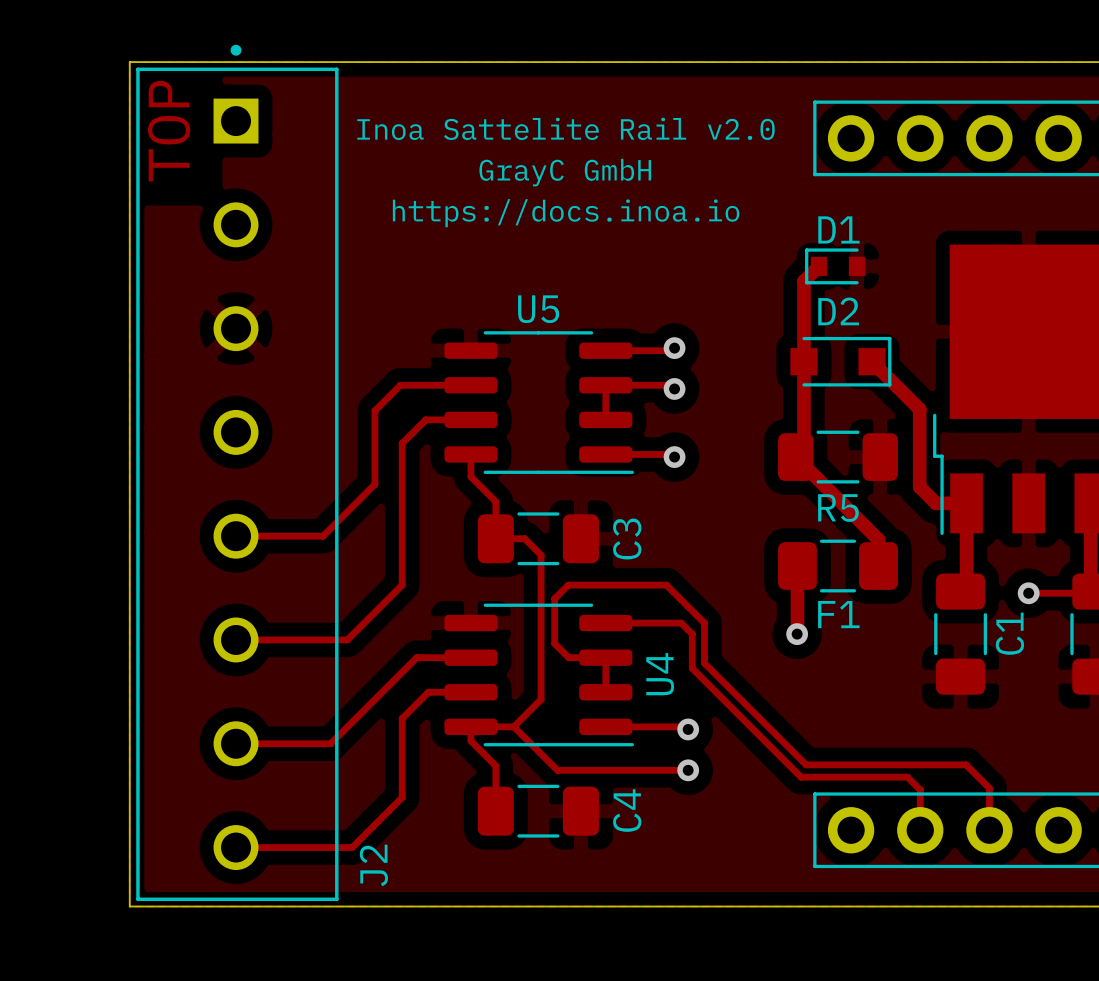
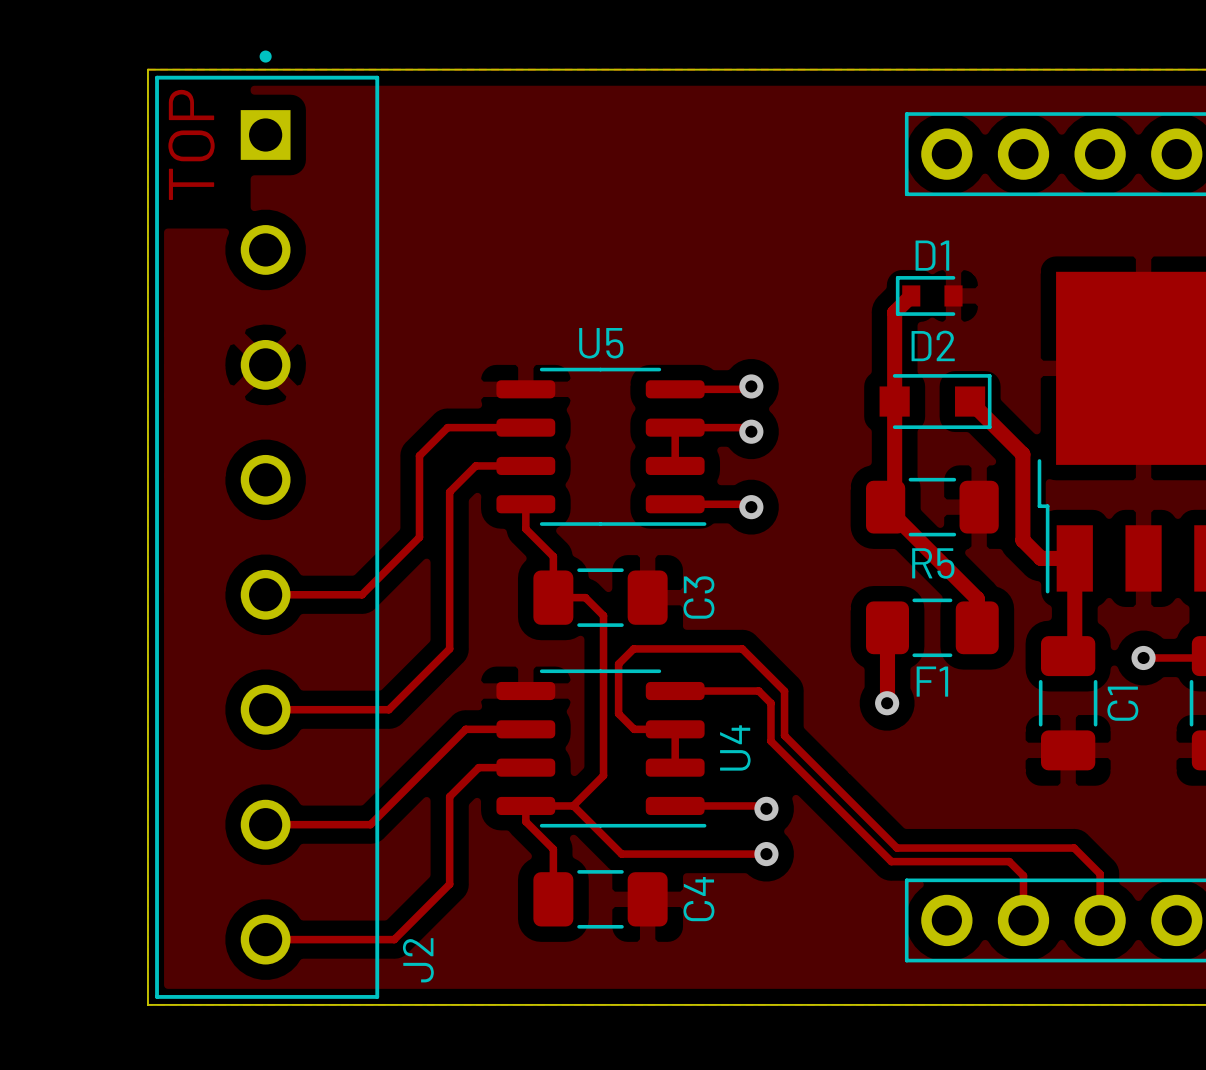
text: Inoa Sattelite Rail v2.0 (566, 128) -> none
text: GrayC GmbH (565, 172) -> none
text: https://docs.inoa.io (566, 213) -> none

